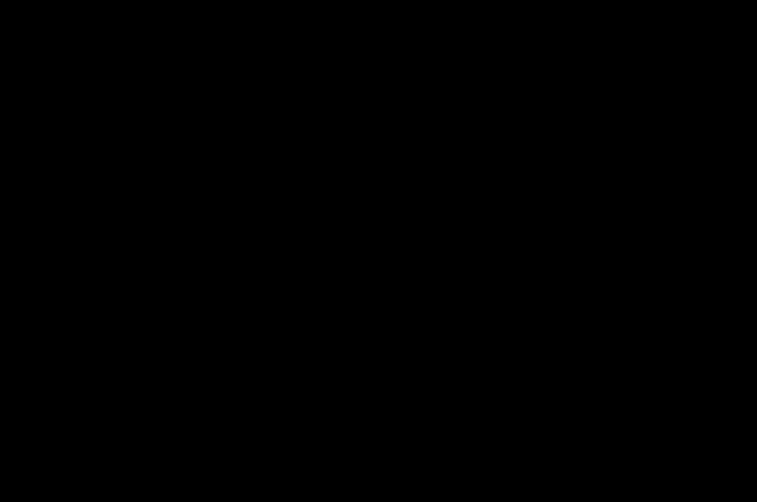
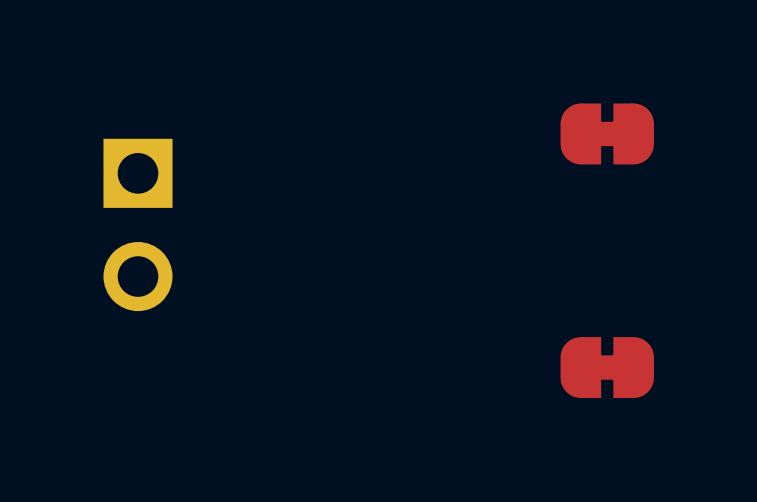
part: none -> (607, 133)
part: none -> (138, 224)
part: none -> (607, 367)

